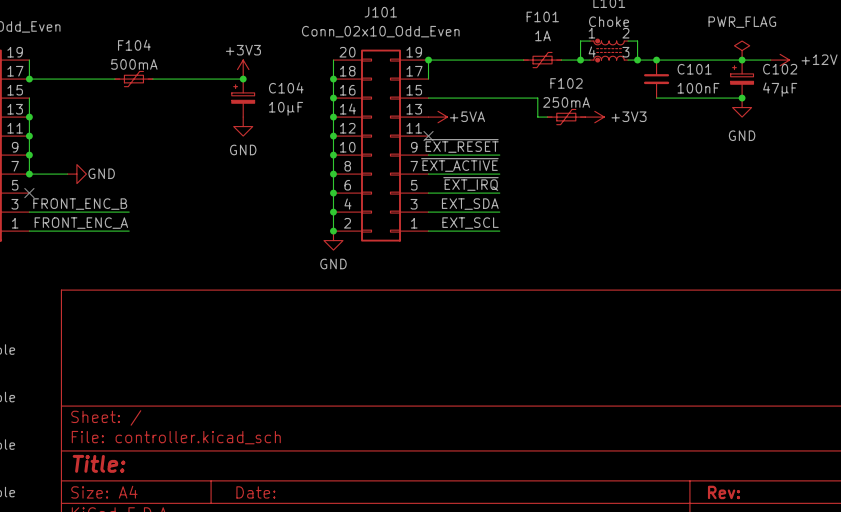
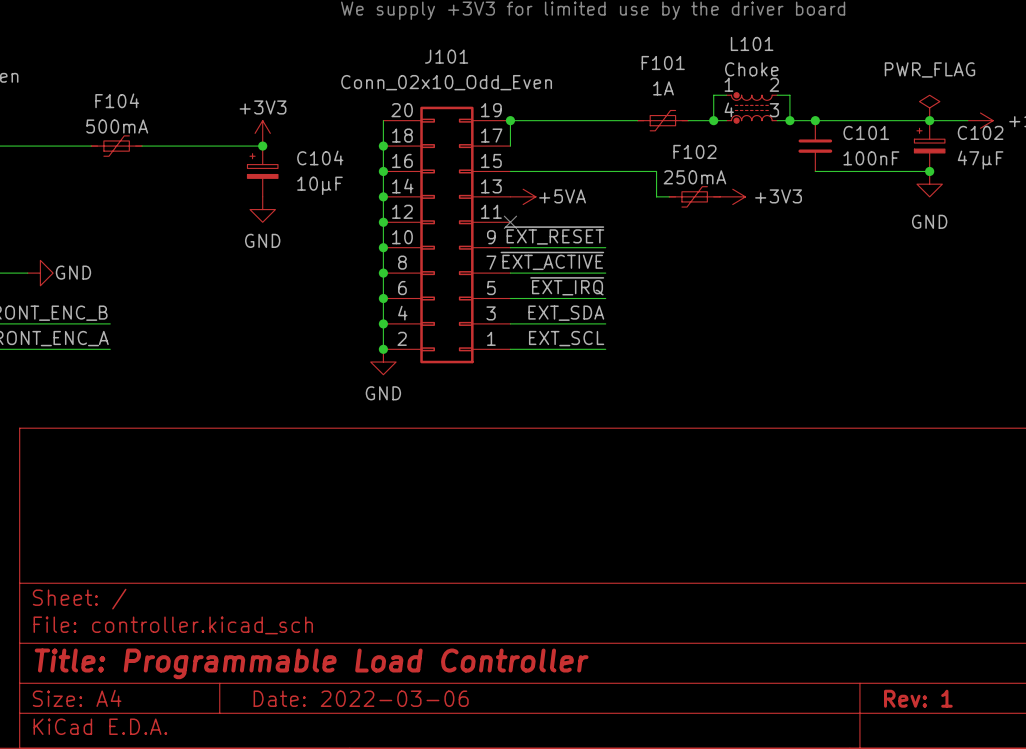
title block: Title: (99, 463) -> Title: Programmable Load Controller (311, 663)
title block: Date: (255, 492) -> Date: 2022-03-06 (361, 698)
title block: Rev: (724, 492) -> Rev: 1 (918, 698)

